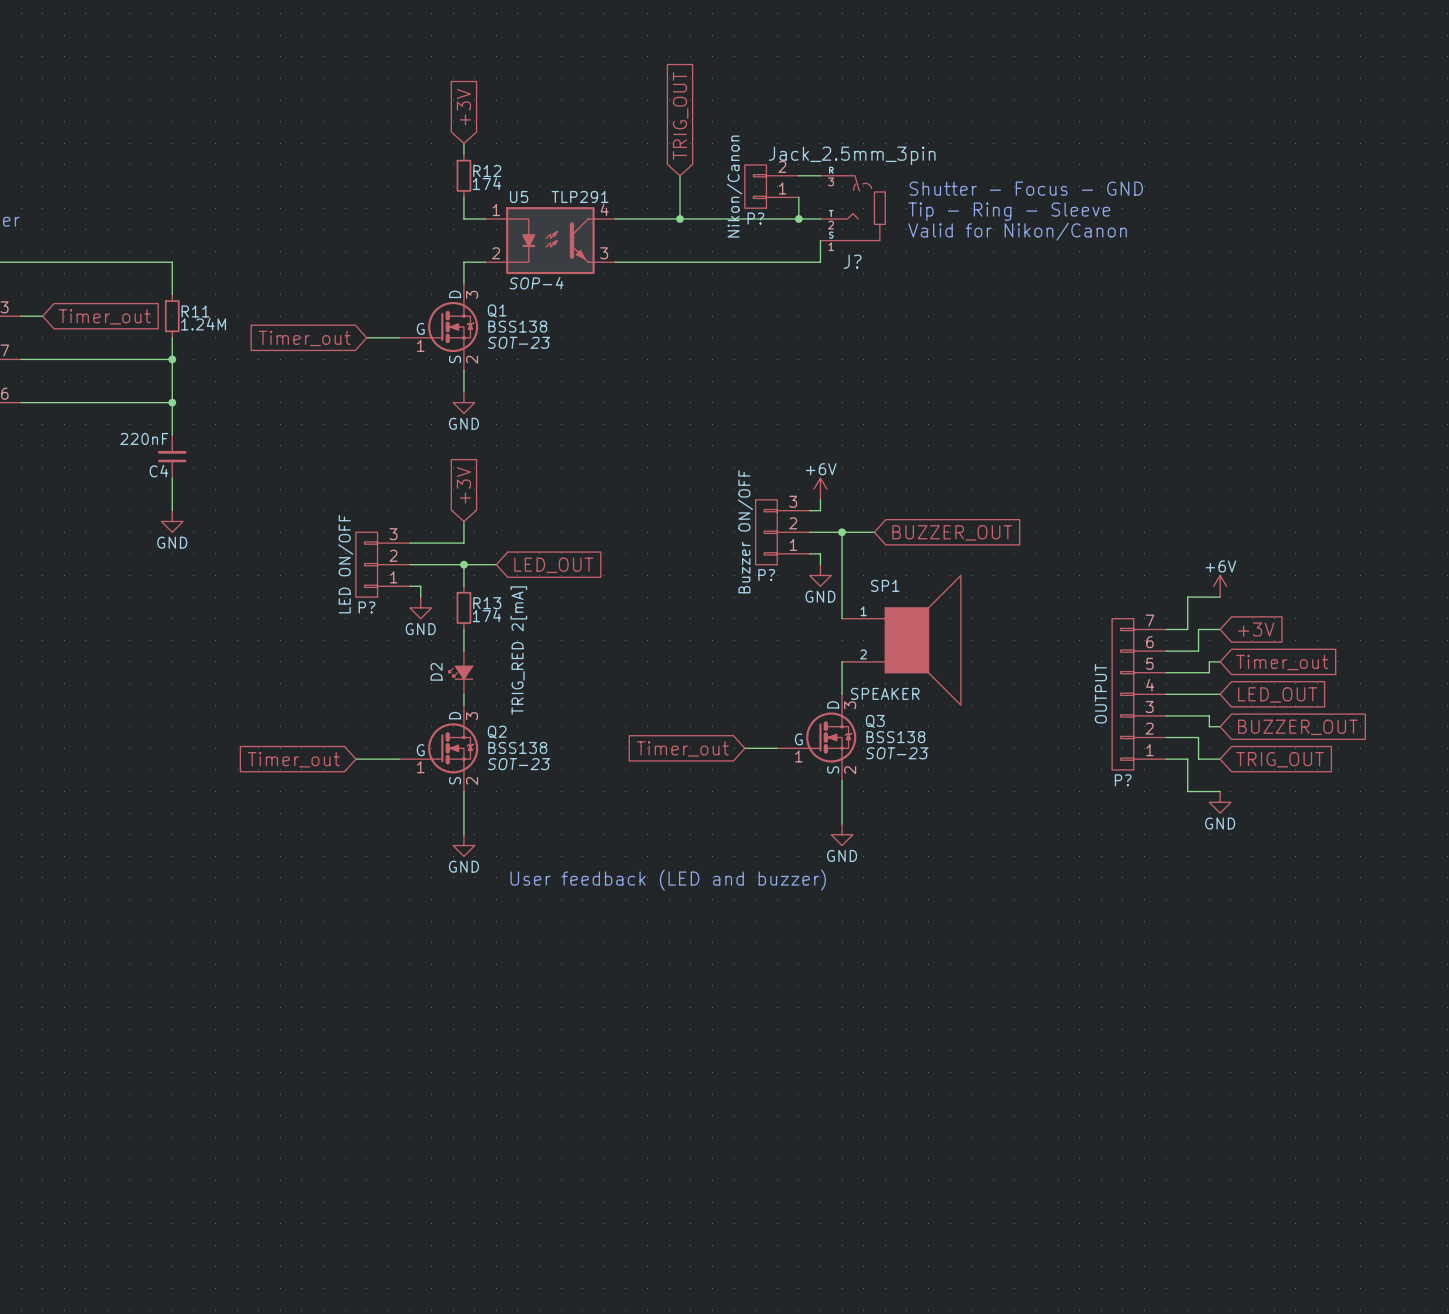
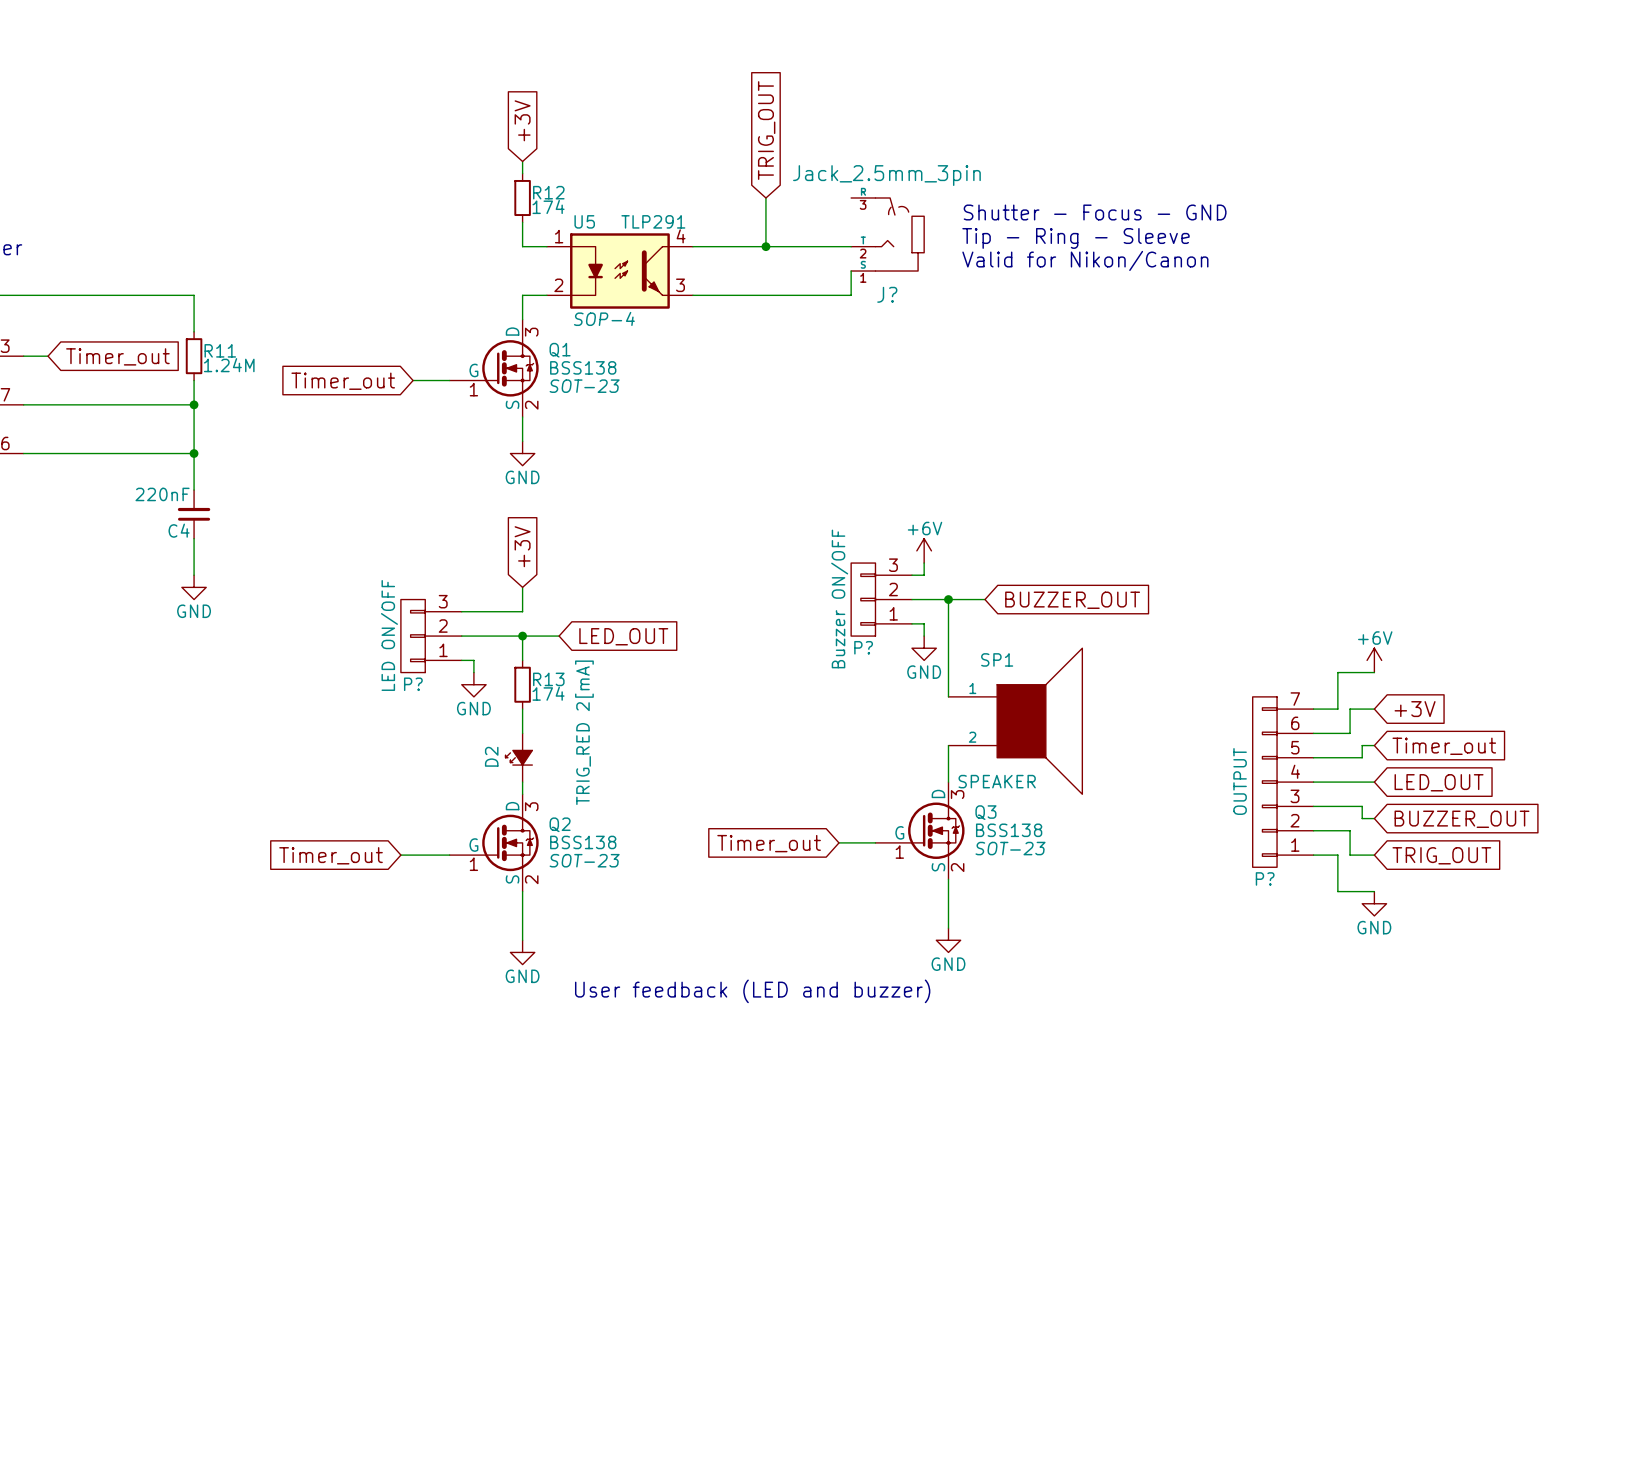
wire: (798, 175) (820, 175) -> none
P?: Nikon/Canon (771, 186) -> none
text position: Shutter - Focus - GND (1026, 188) -> Shutter - Focus - GND (1095, 212)
wire: (798, 197) (798, 218) -> none
J? position: (852, 208) -> (887, 234)
text position: Tip - Ring - Sleeve (1009, 211) -> Tip - Ring - Sleeve (1076, 238)
wire: (755, 218) (820, 218) -> none
junction: (798, 218) -> none
text position: Valid for Nikon/Canon (1017, 231) -> Valid for Nikon/Canon (1085, 260)
wire: (820, 240) (820, 262) (755, 262) -> (851, 271) (851, 295)

